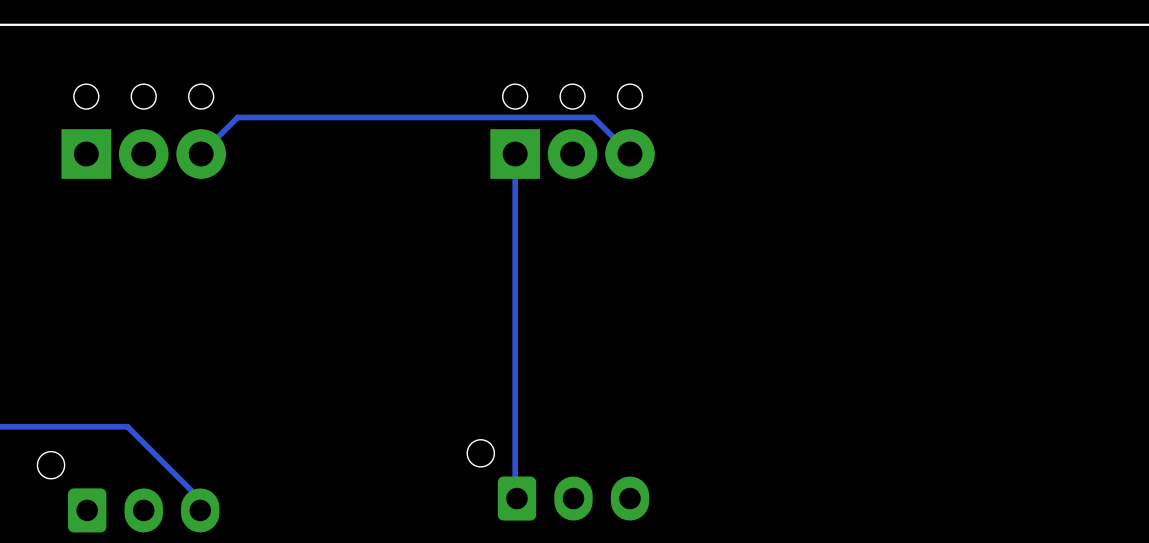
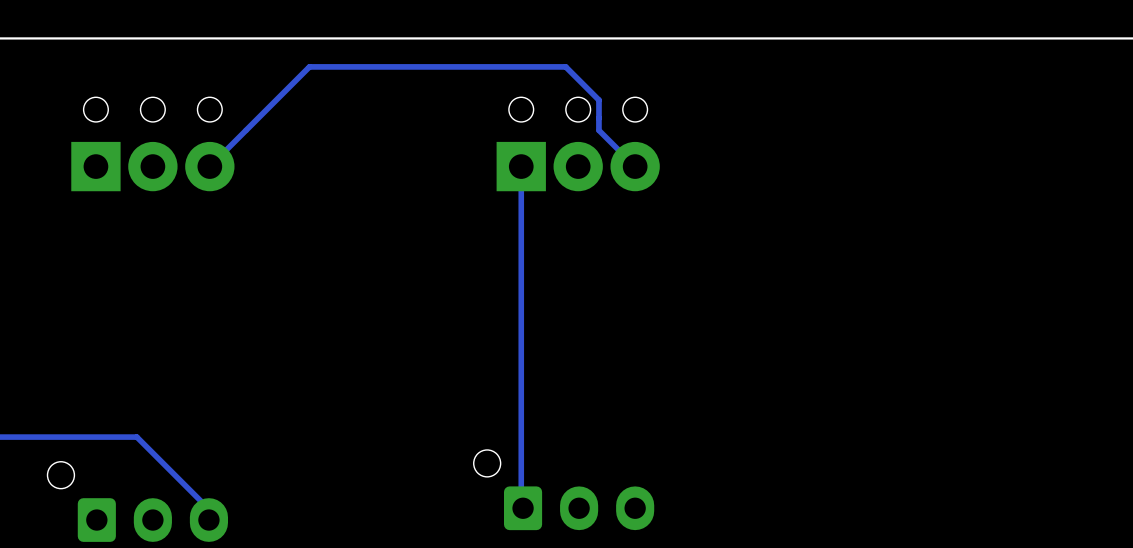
track: none -> (598, 118) (598, 130)
track: (593, 117) (237, 117) -> (598, 118) (598, 100) (565, 66) (309, 66) (246, 130)

